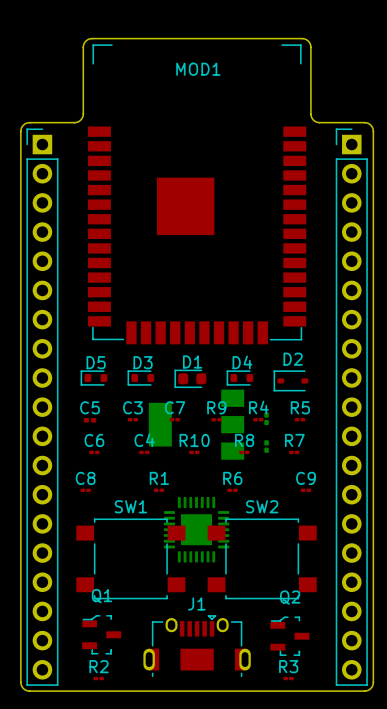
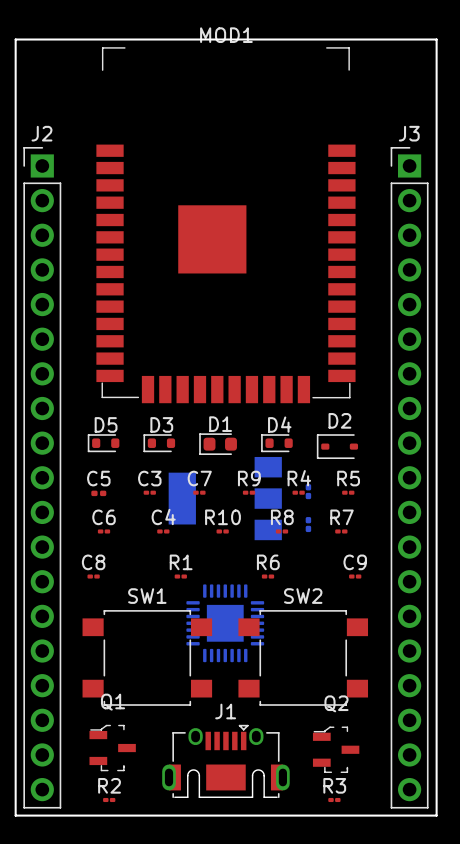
board edge: (92, 38) (304, 38) (310, 46) (310, 114) (312, 119) (319, 122) (365, 122) (372, 128) (373, 682) (367, 690) (29, 691) (21, 685) (20, 130) (22, 125) (28, 122) (75, 122) (81, 119) (83, 113) (83, 46) (85, 41) (92, 38) -> (15, 39) (15, 815) (436, 815) (436, 39) (15, 39)
MOD1 name position: MOD1 (198, 69) -> MOD1 (226, 35)
J2 name: none -> J2 (41, 133)
J3 name: none -> J3 (409, 133)
J1 footprint: [143, 615, 251, 677] -> [162, 724, 290, 799]

